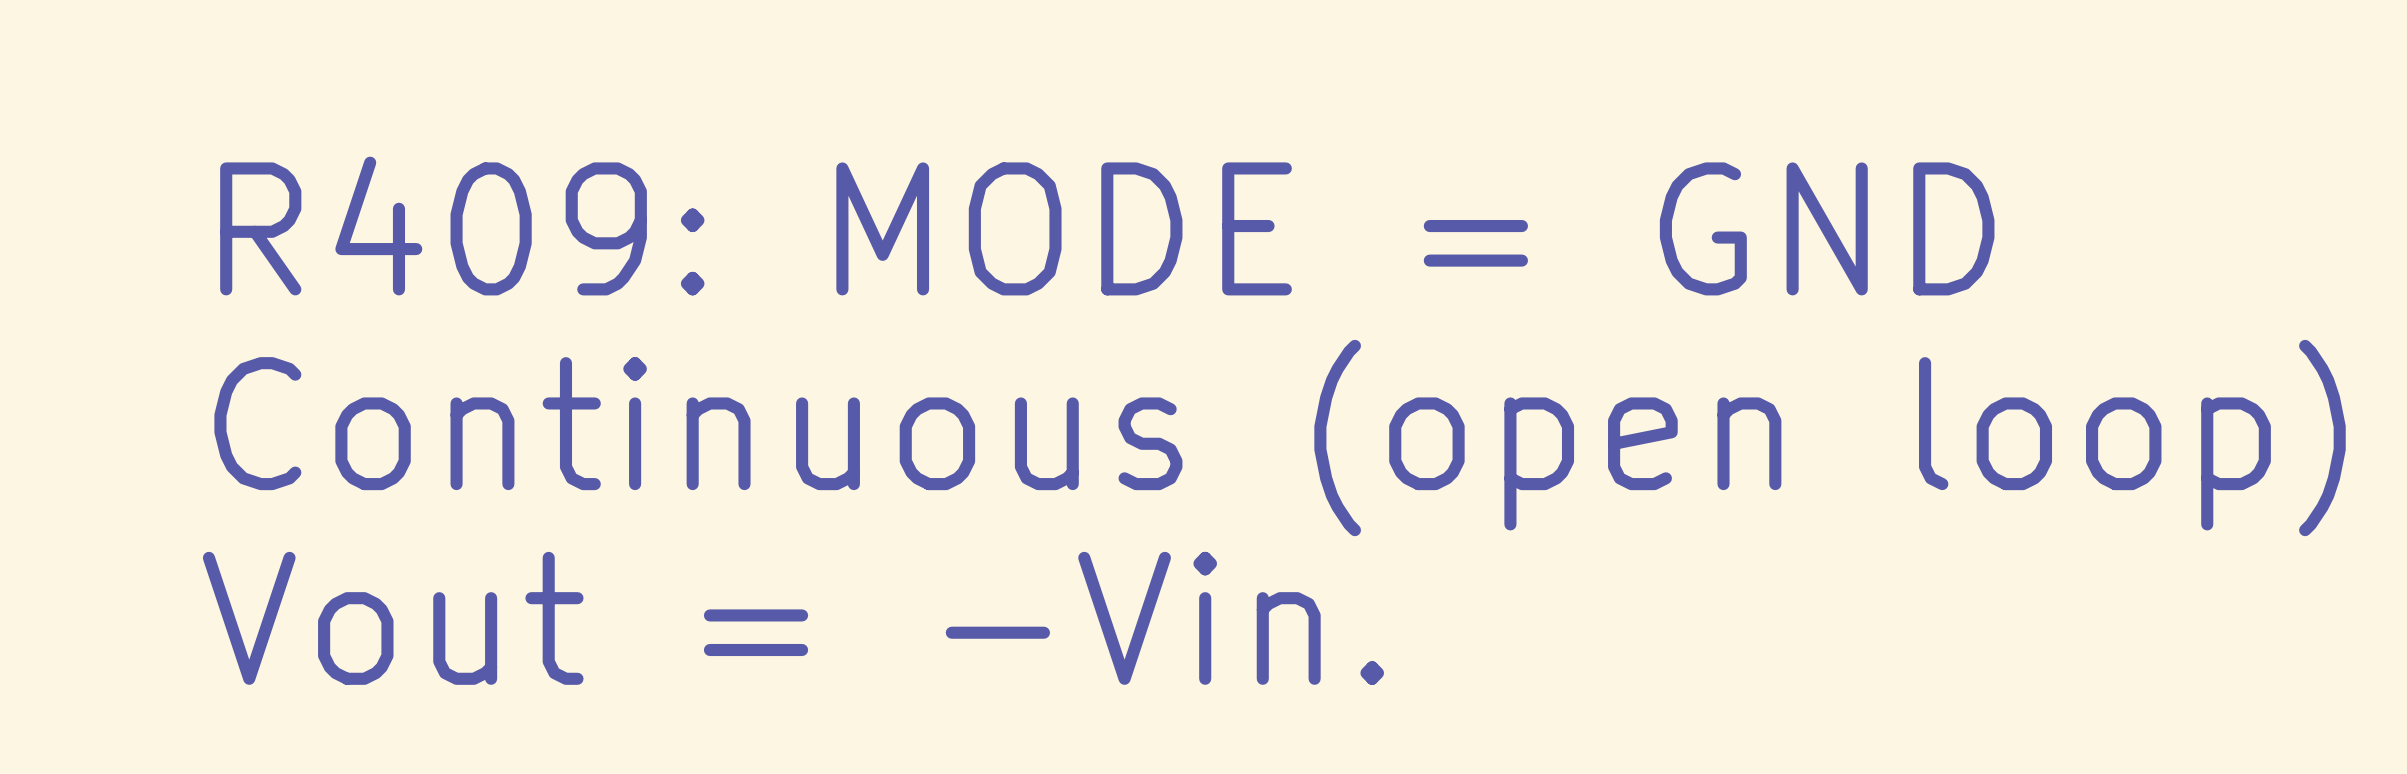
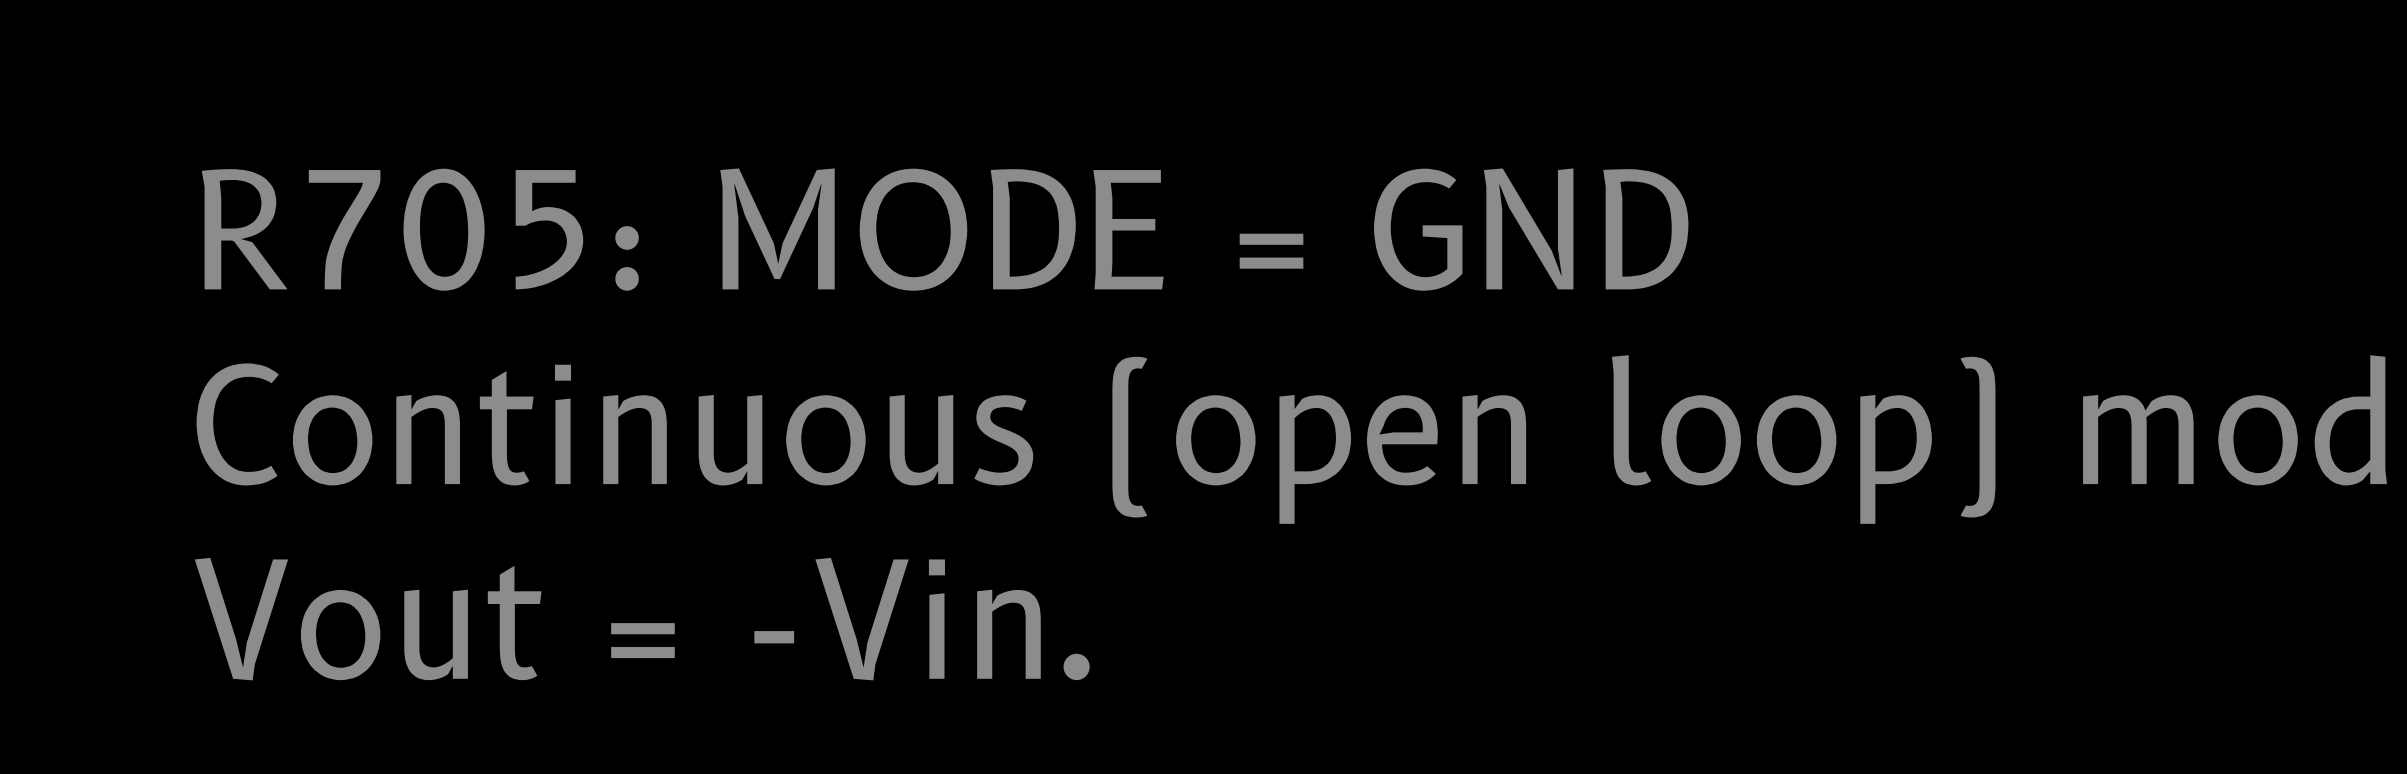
text: R409: MODE = GND (1107, 226) -> R705: MODE = GND (945, 229)

